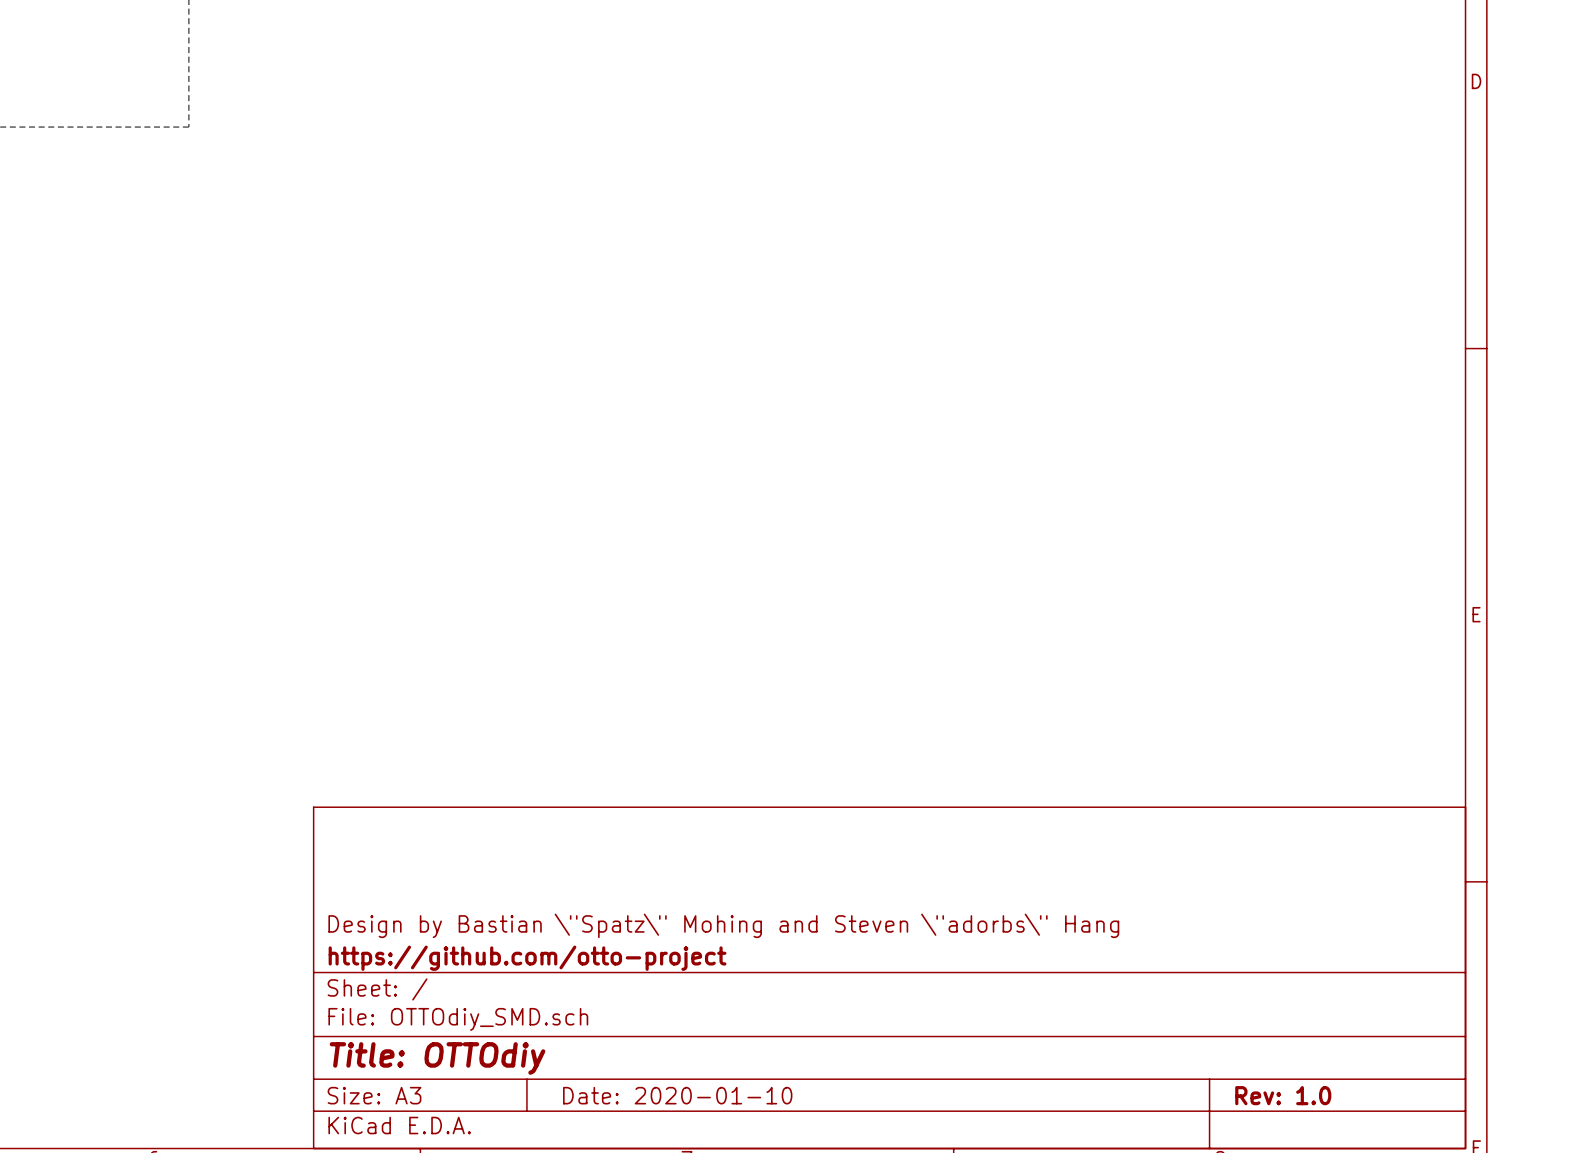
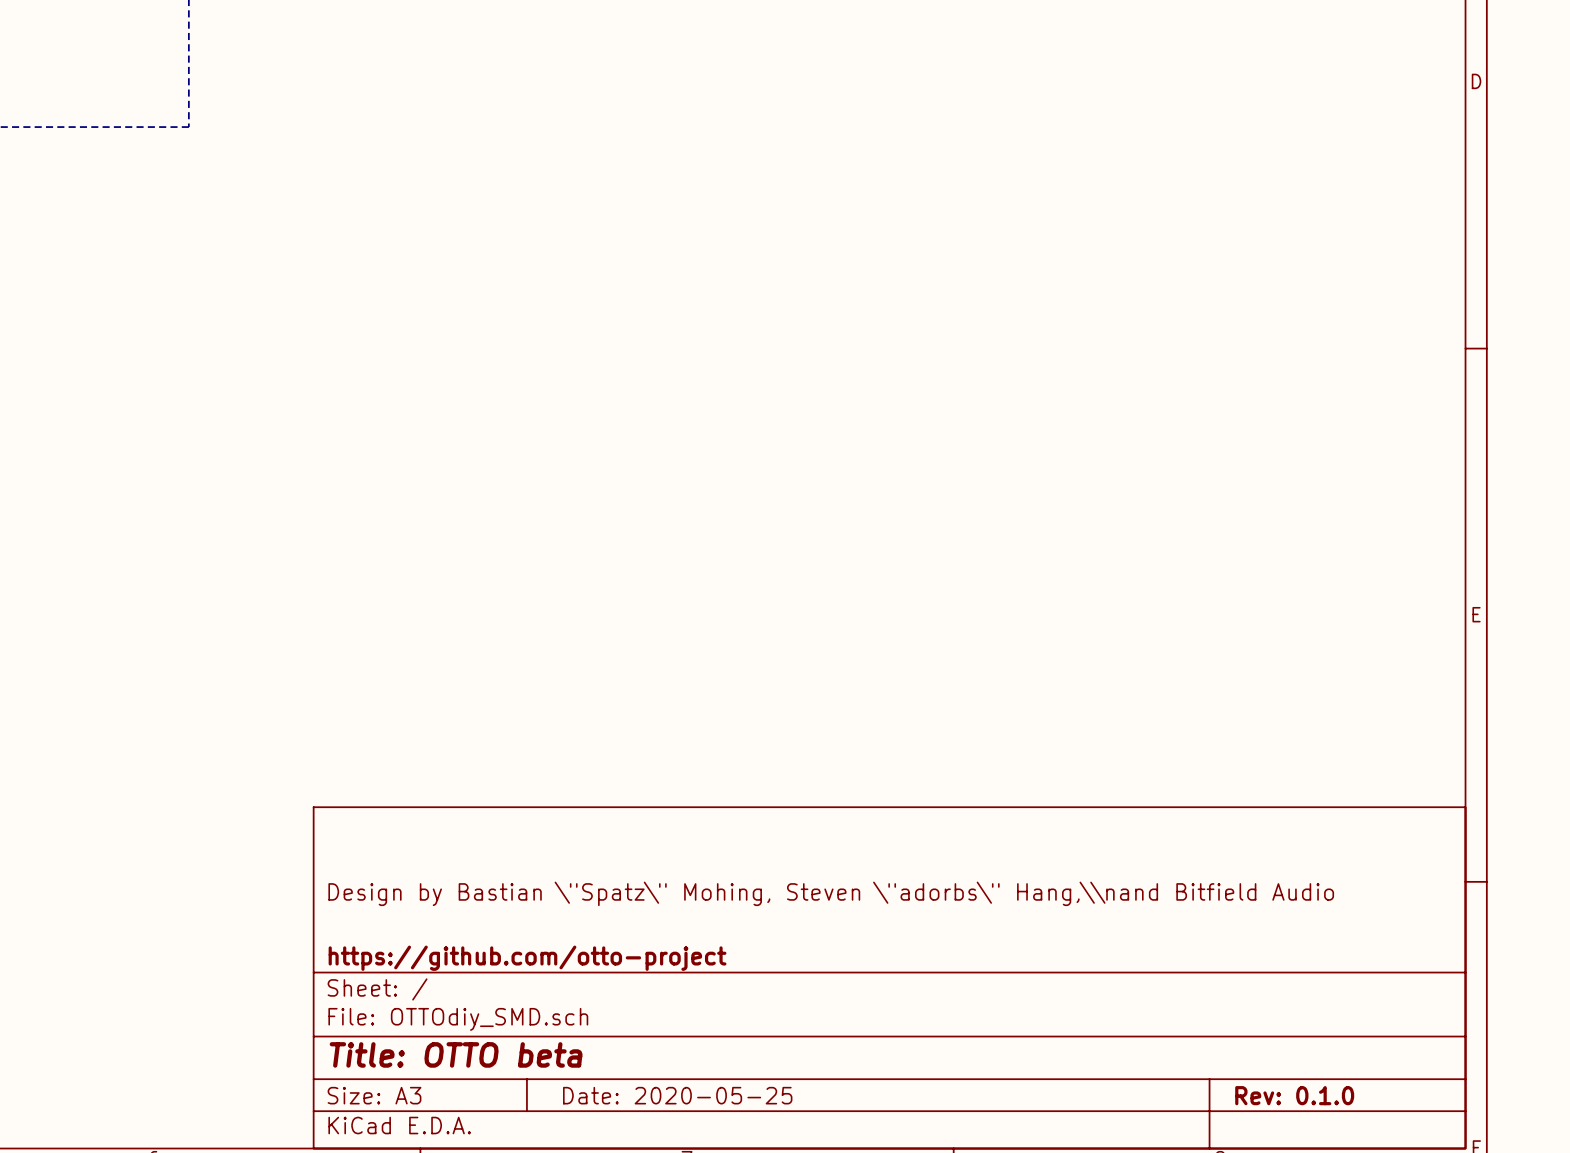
title block: Design by Bastian \"Spatz\" Mohing and Steven \"adorbs\" Hang (723, 925) -> Design by Bastian \"Spatz\" Mohing, Steven \"adorbs\" Hang,\\nand Bitfield Audio (831, 893)
title block: Title: OTTOdiy (437, 1058) -> Title: OTTO beta (456, 1054)
title block: Date: 2020-01-10 (677, 1095) -> Date: 2020-05-25 (677, 1095)
title block: Rev: 1.0 (1283, 1095) -> Rev: 0.1.0 (1294, 1095)

